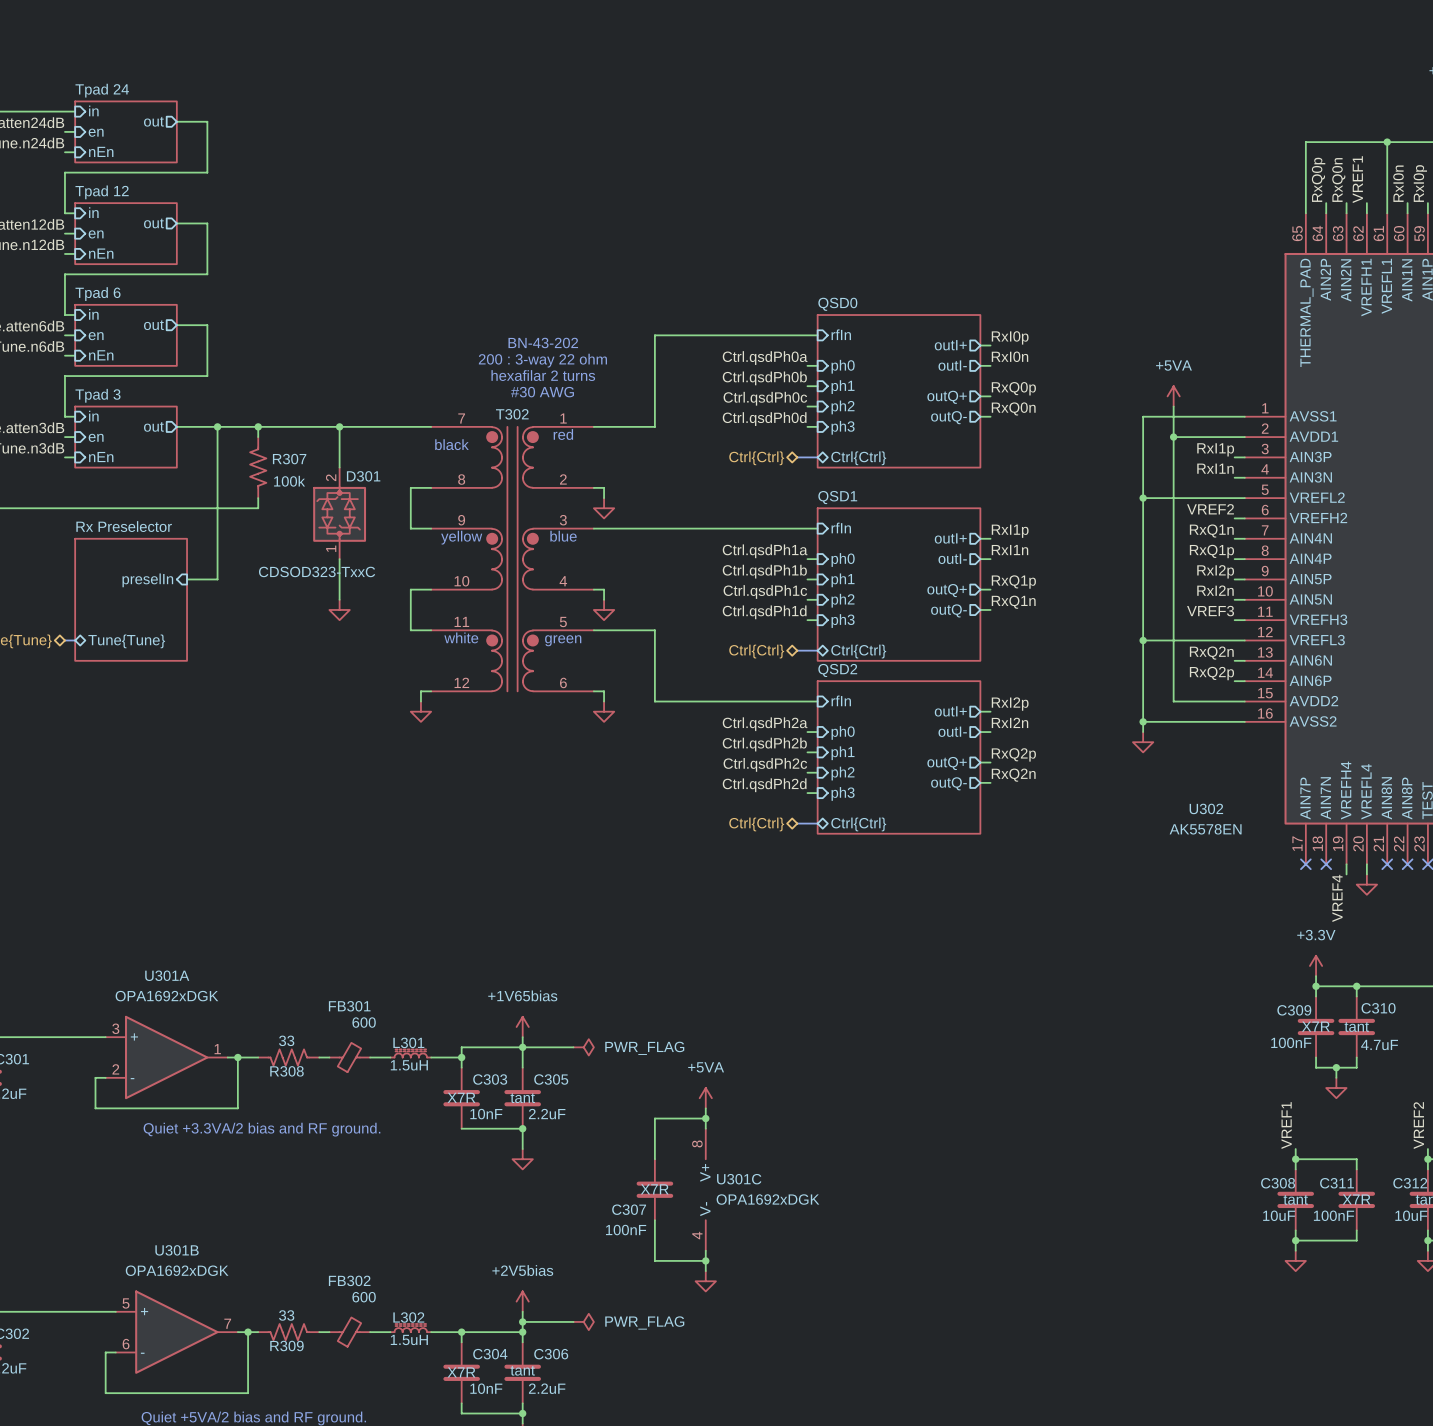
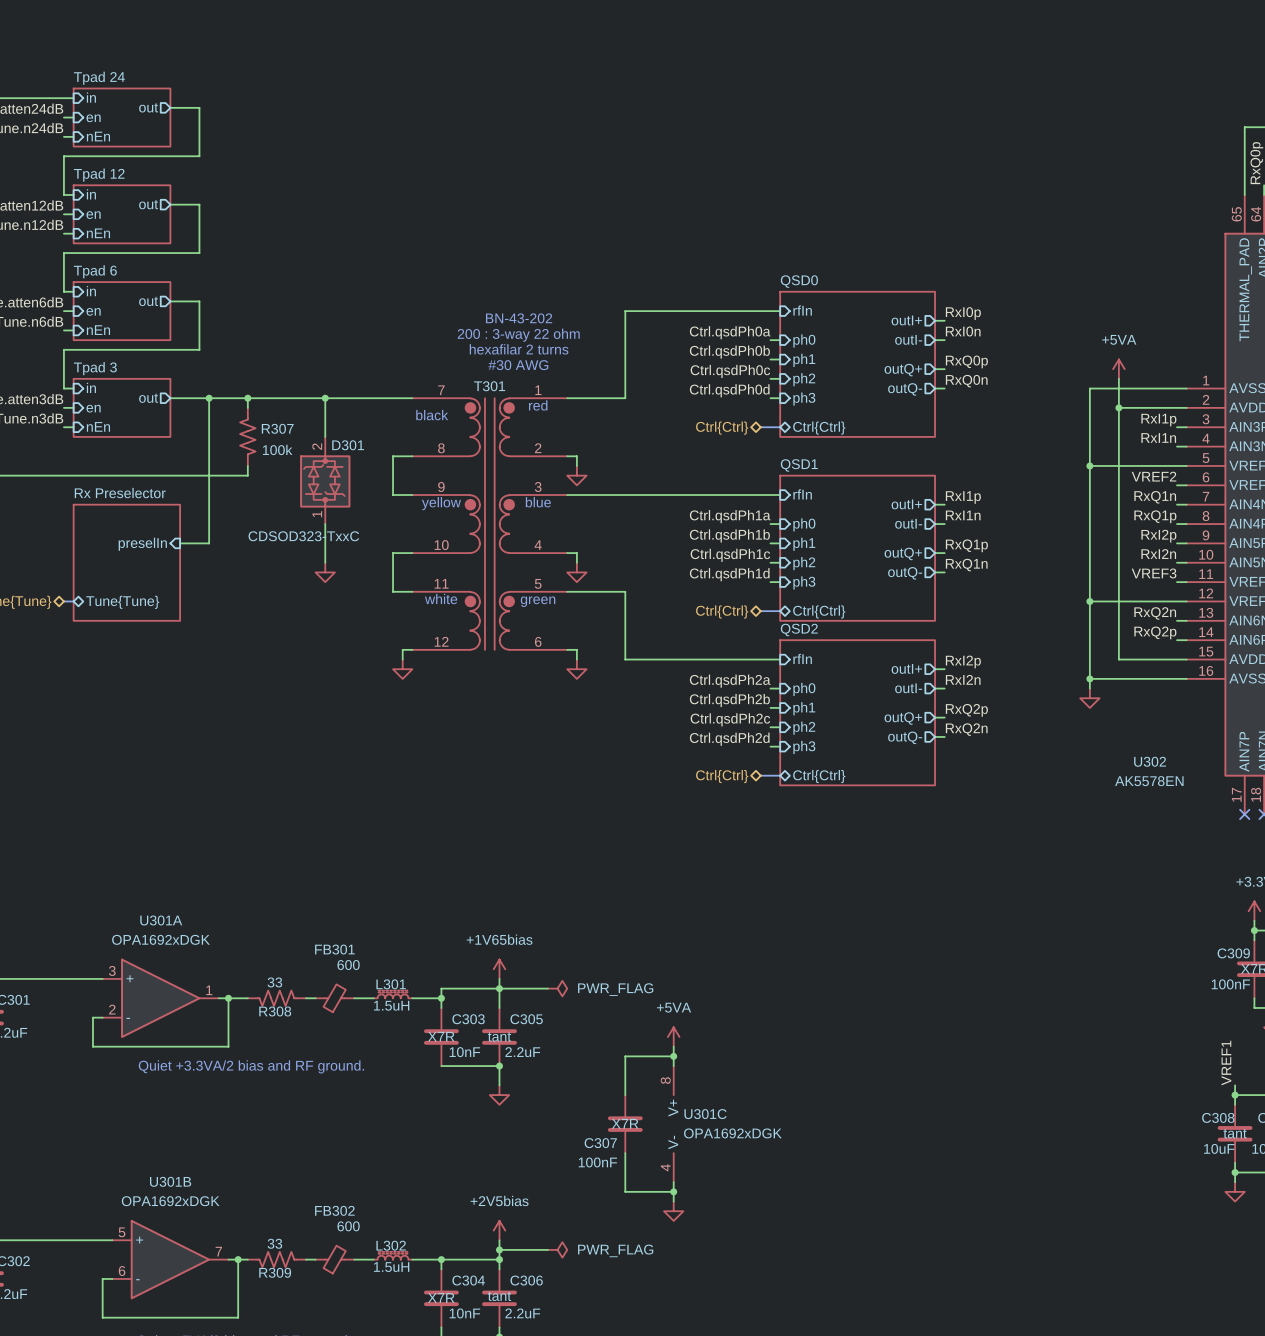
T302 name: T302 (512, 414) -> T301 (489, 386)

